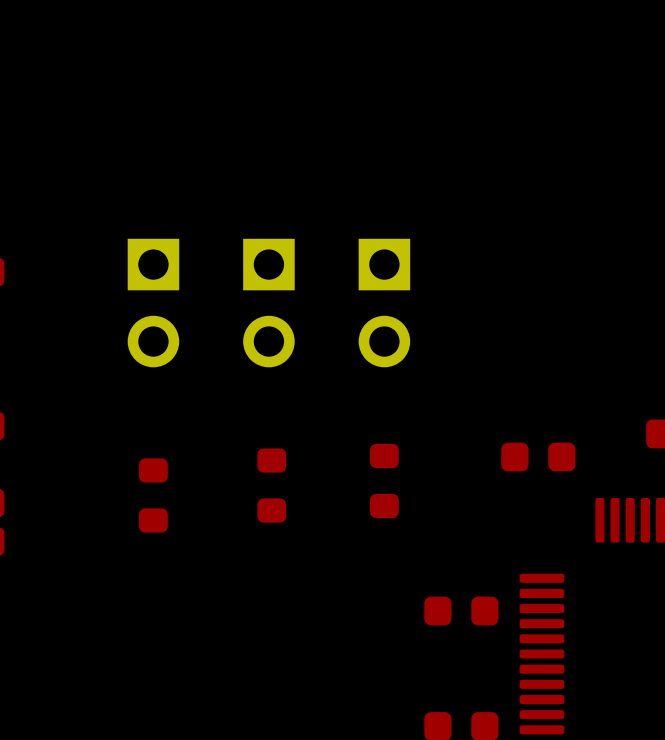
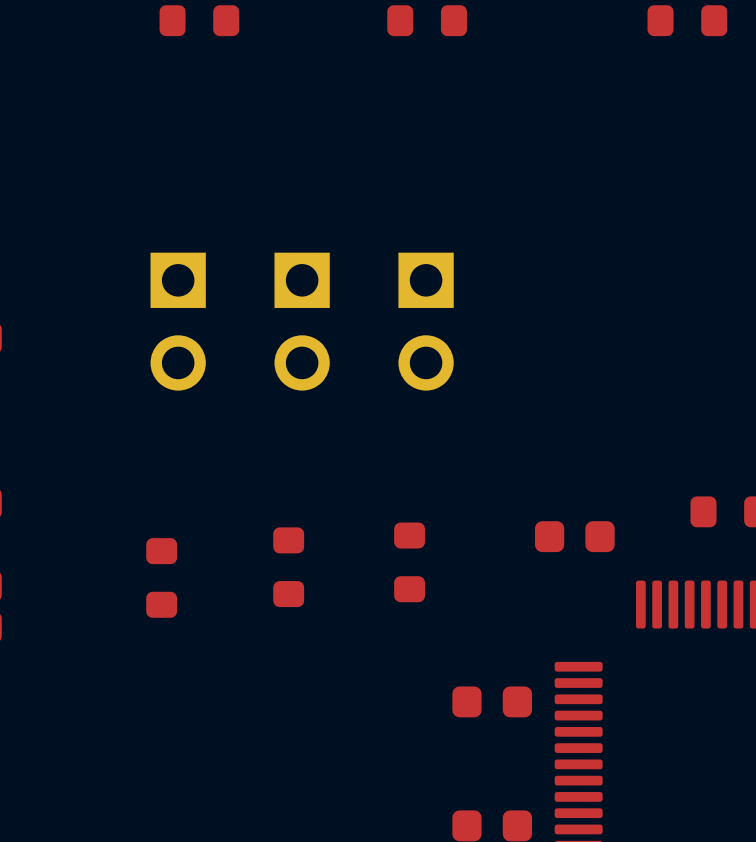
part position: (153, 303) -> (178, 321)
part position: (268, 303) -> (302, 321)
part position: (384, 303) -> (426, 321)

